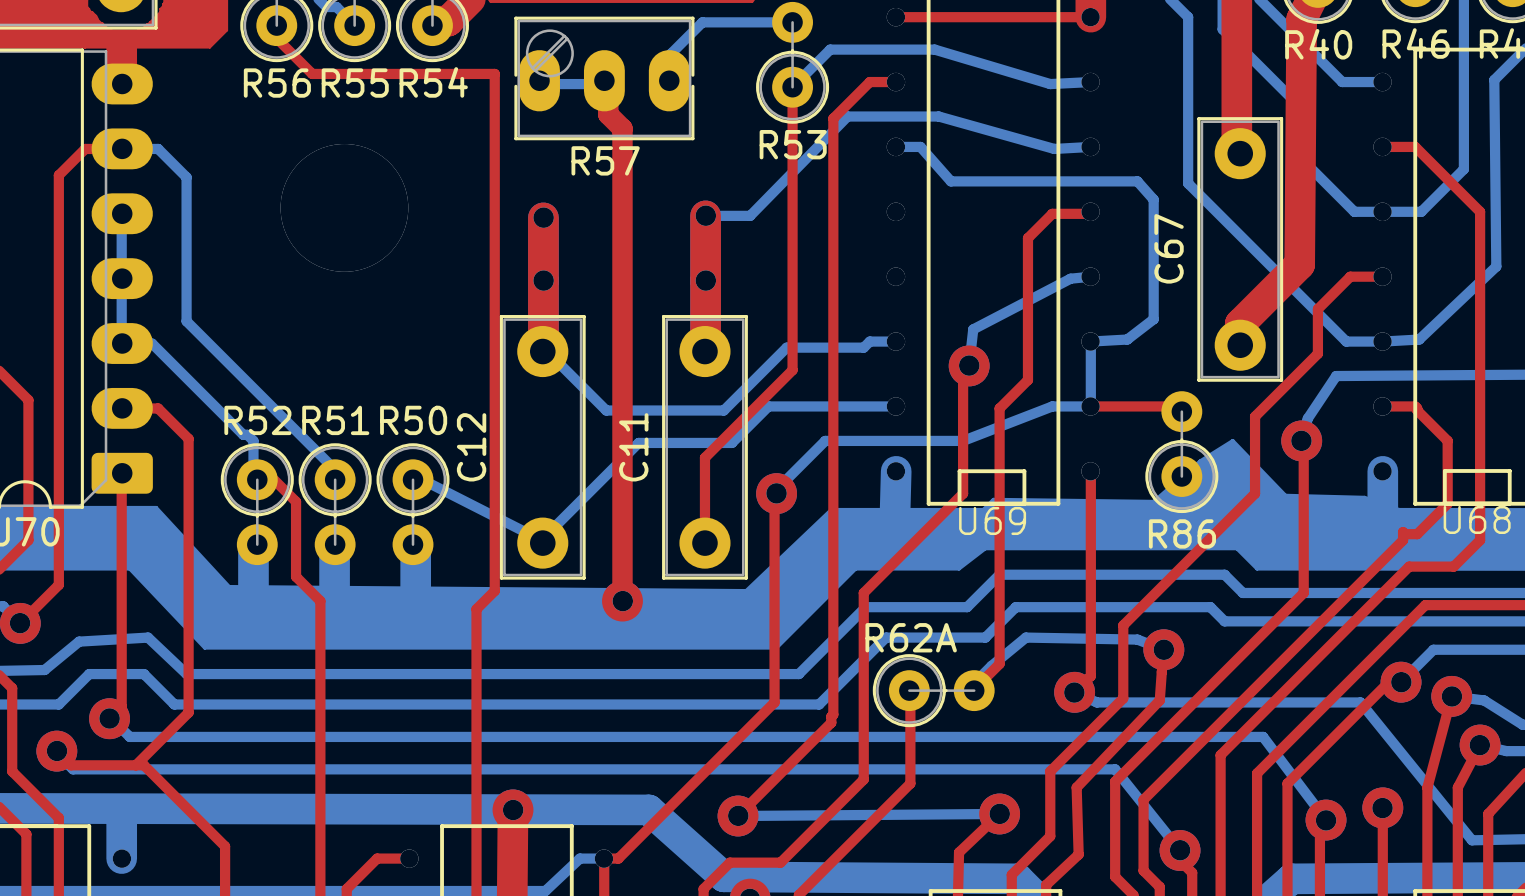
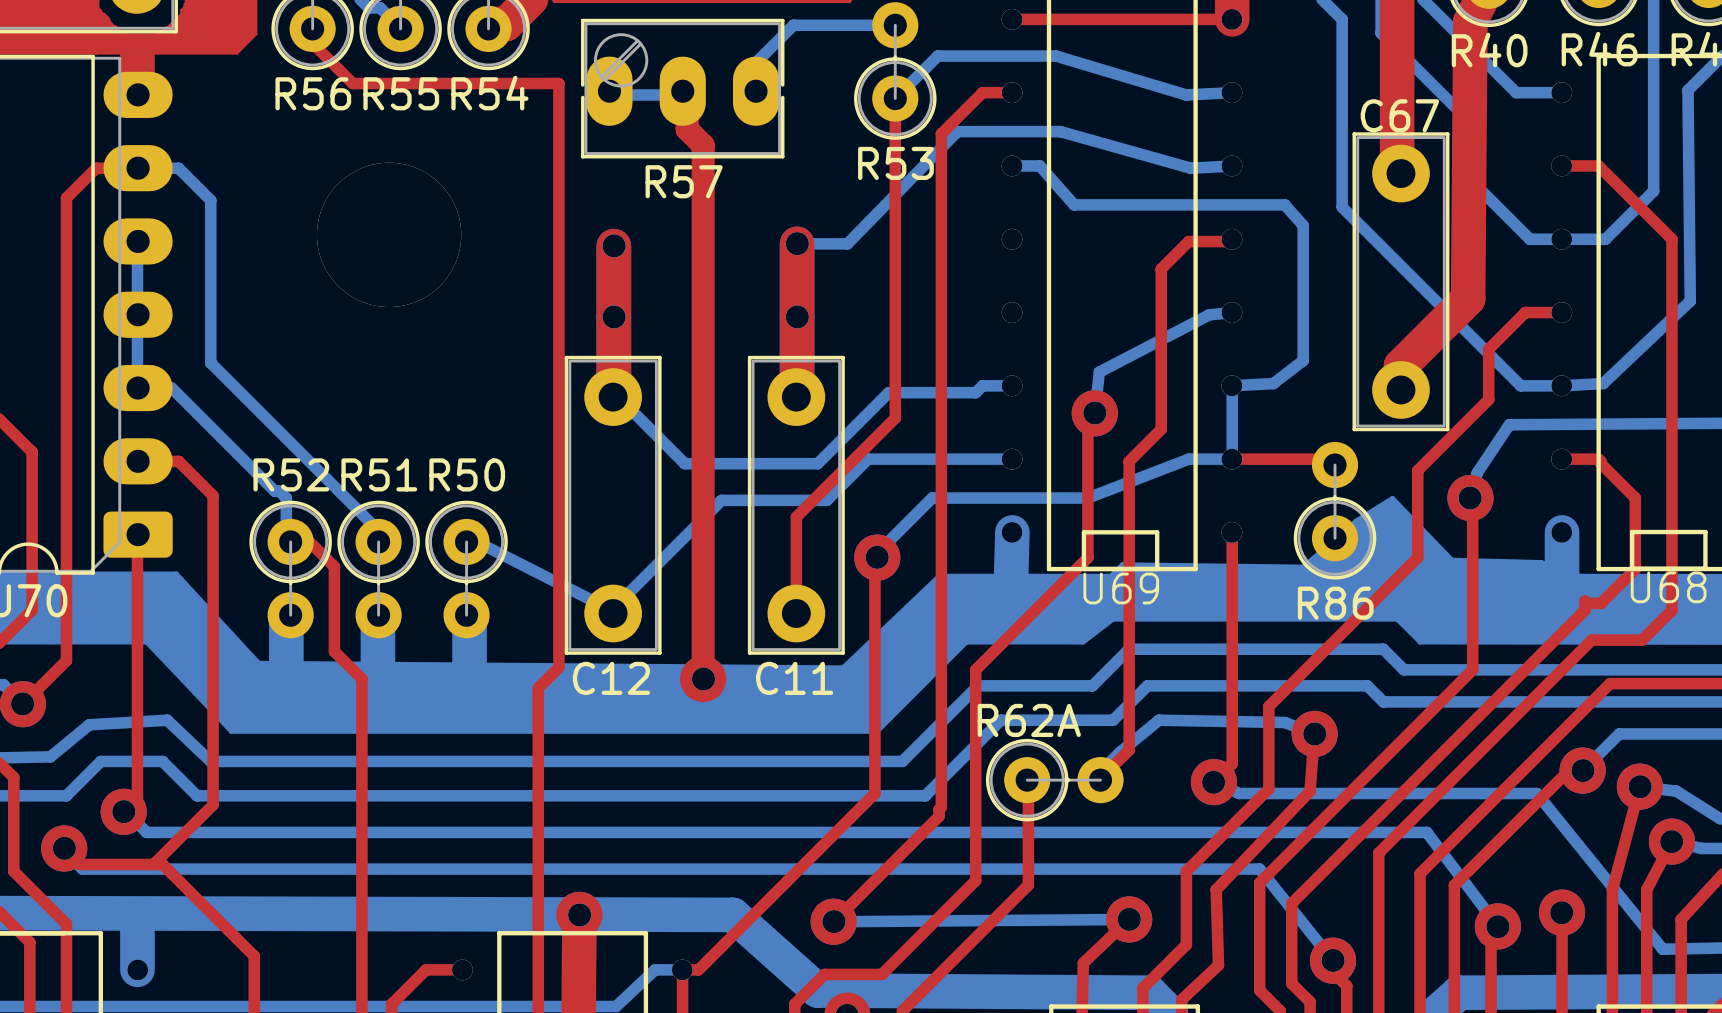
C67 name rotation: 0° (1169, 248) -> 90° clockwise (1399, 115)
C67 name position: C67 (1169, 248) -> C67 (1399, 115)
C12 name rotation: 0° (471, 447) -> 90° clockwise (611, 678)
C12 name position: C12 (471, 447) -> C12 (611, 678)
C11 name rotation: 0° (633, 447) -> 90° clockwise (794, 678)
C11 name position: C11 (633, 447) -> C11 (794, 678)

